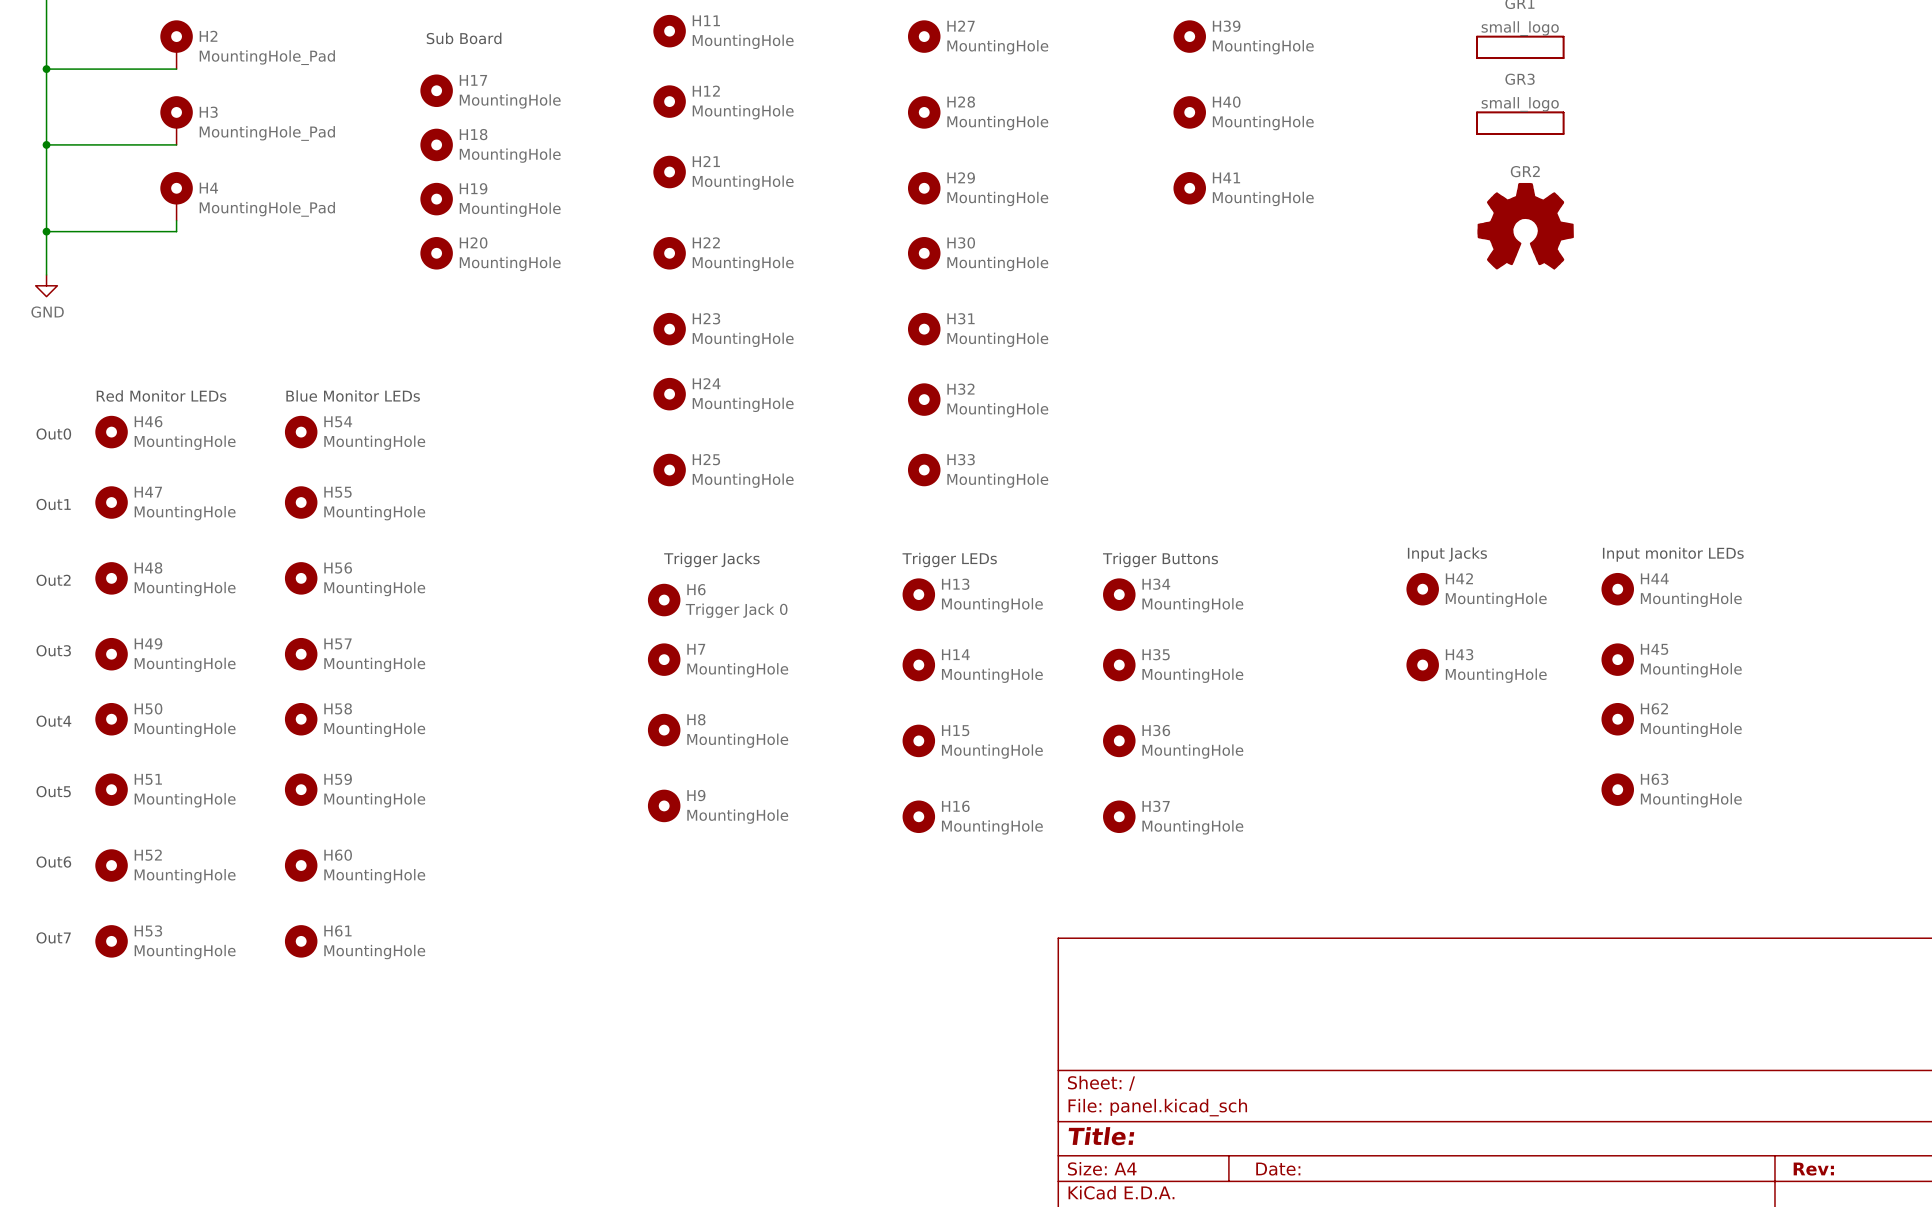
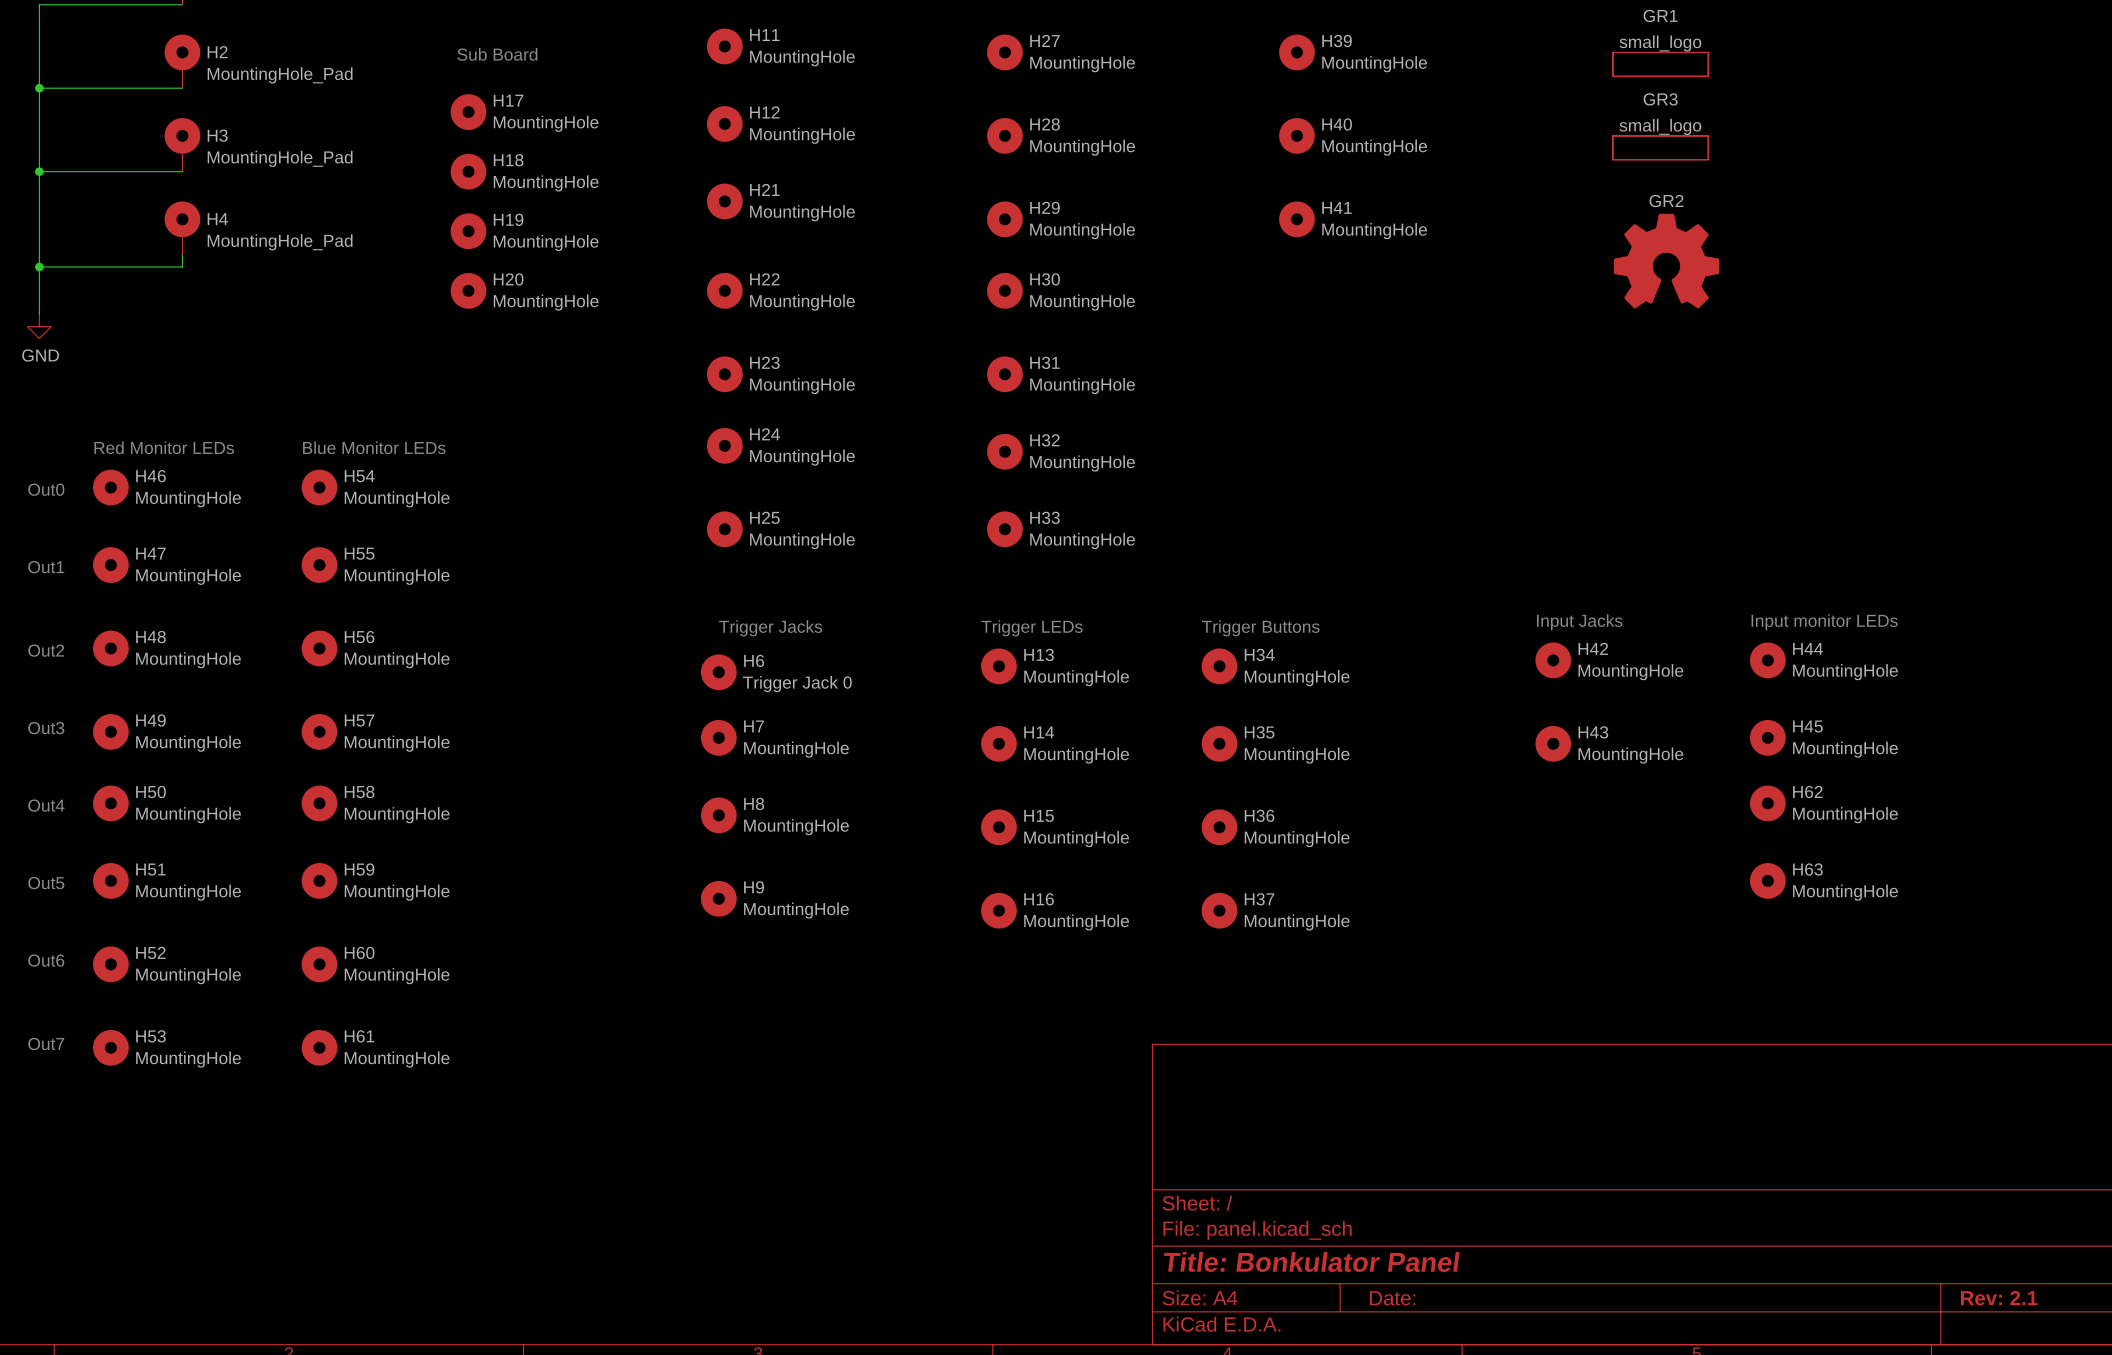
title block: Title: (1101, 1136) -> Title: Bonkulator Panel (1311, 1261)
title block: Rev: (1813, 1169) -> Rev: 2.1 (1999, 1298)

